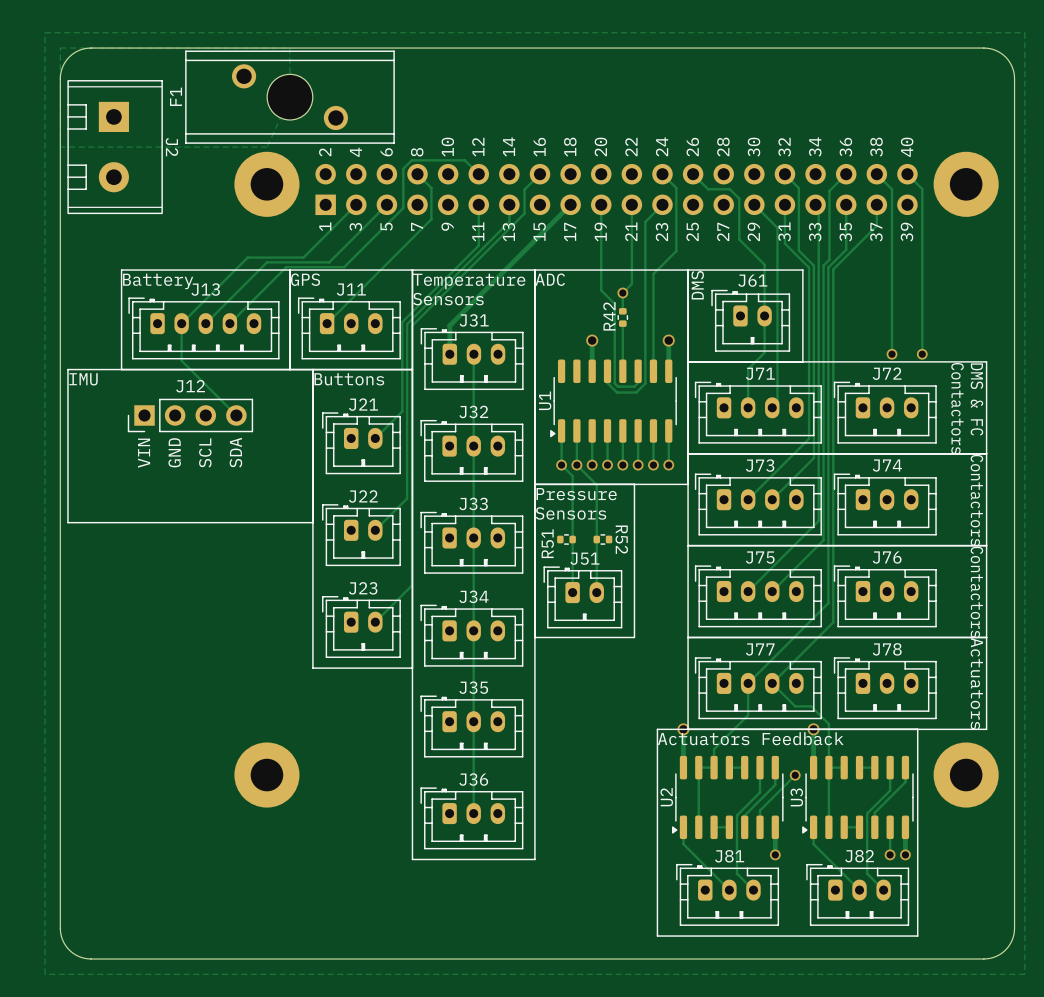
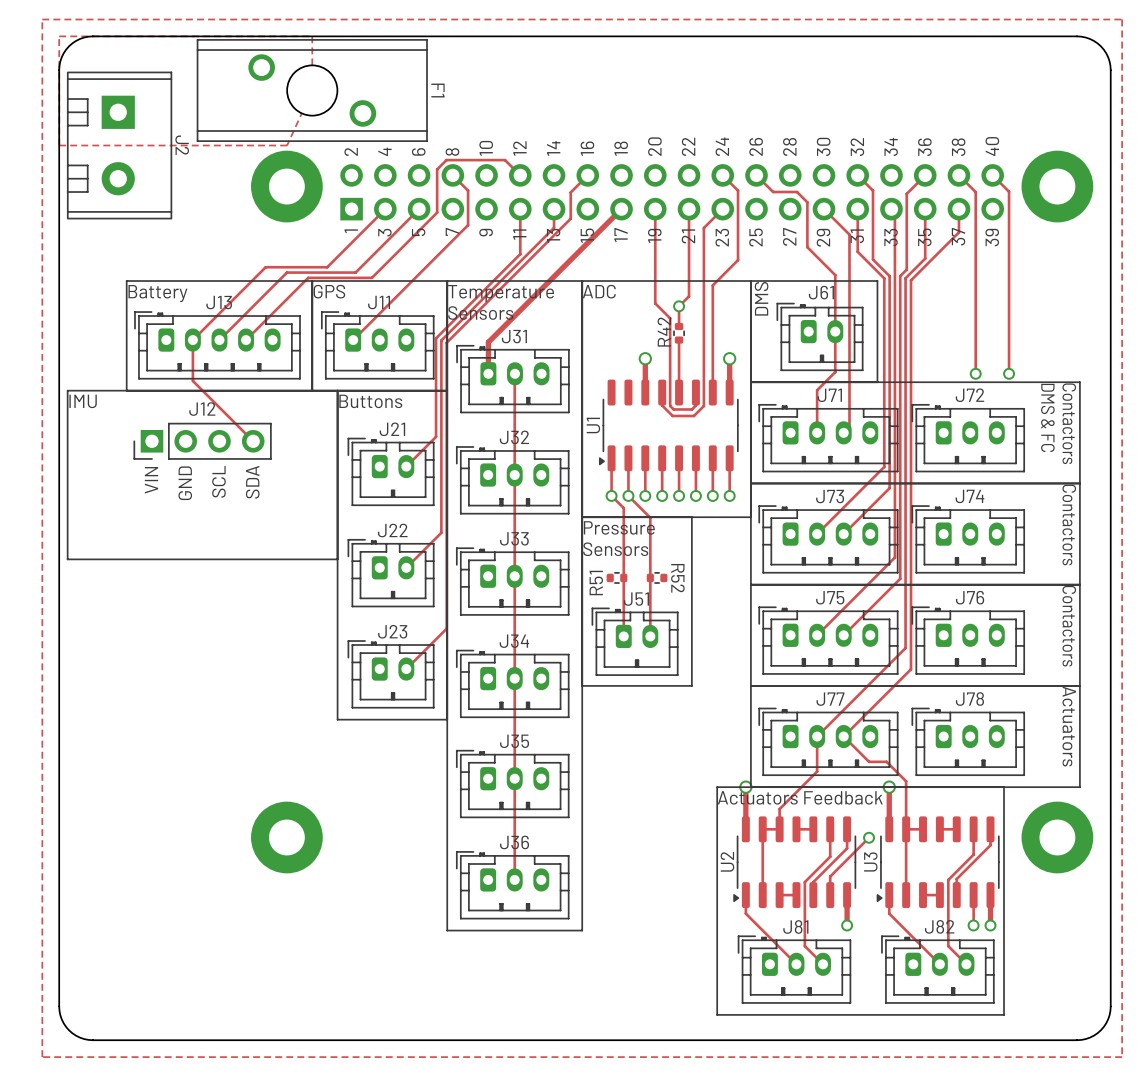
F1 name rotation: 0° (176, 96) -> 180° (437, 90)
F1 name position: F1 (176, 96) -> F1 (437, 90)
text: DMS & FC (976, 399) -> Contactors (1069, 423)
text: Contactors (957, 408) -> DMS & FC (1047, 417)

